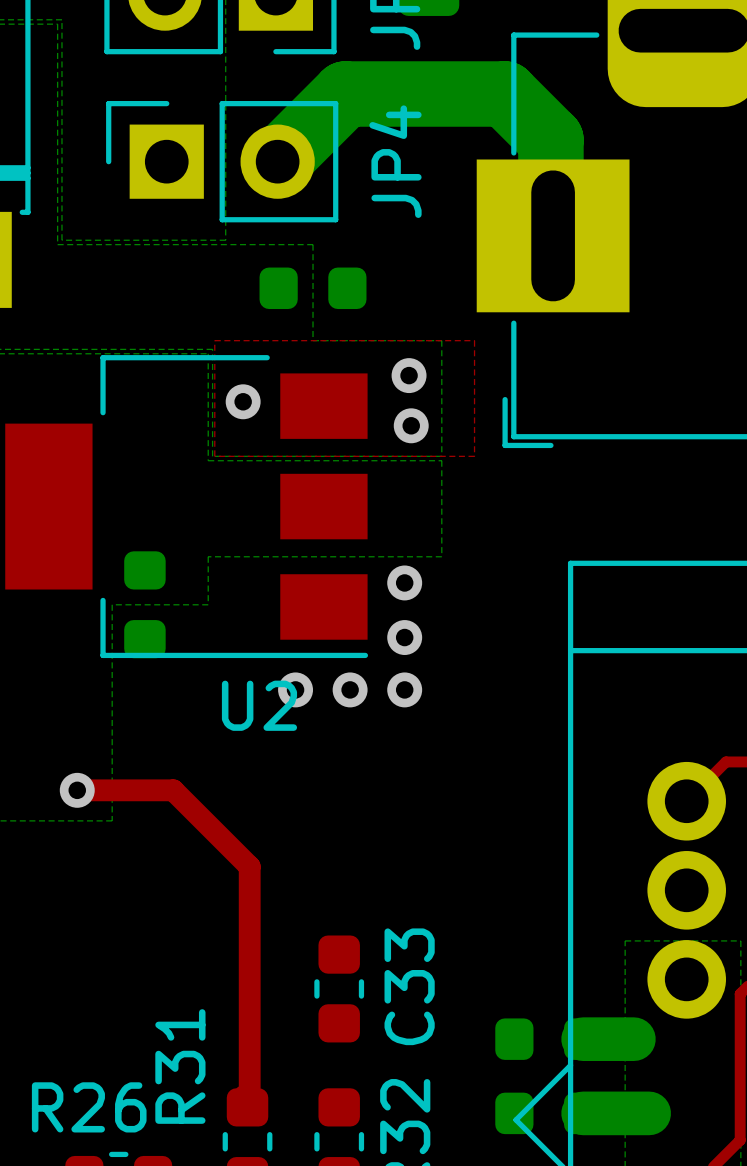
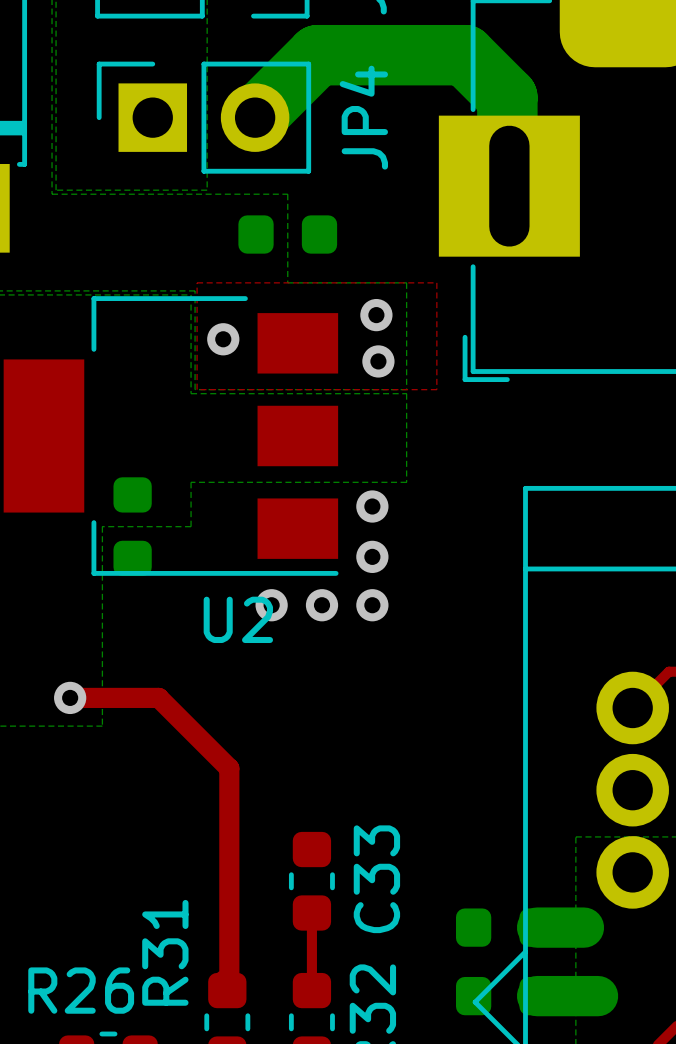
top track: none -> (311, 913) (311, 992)

